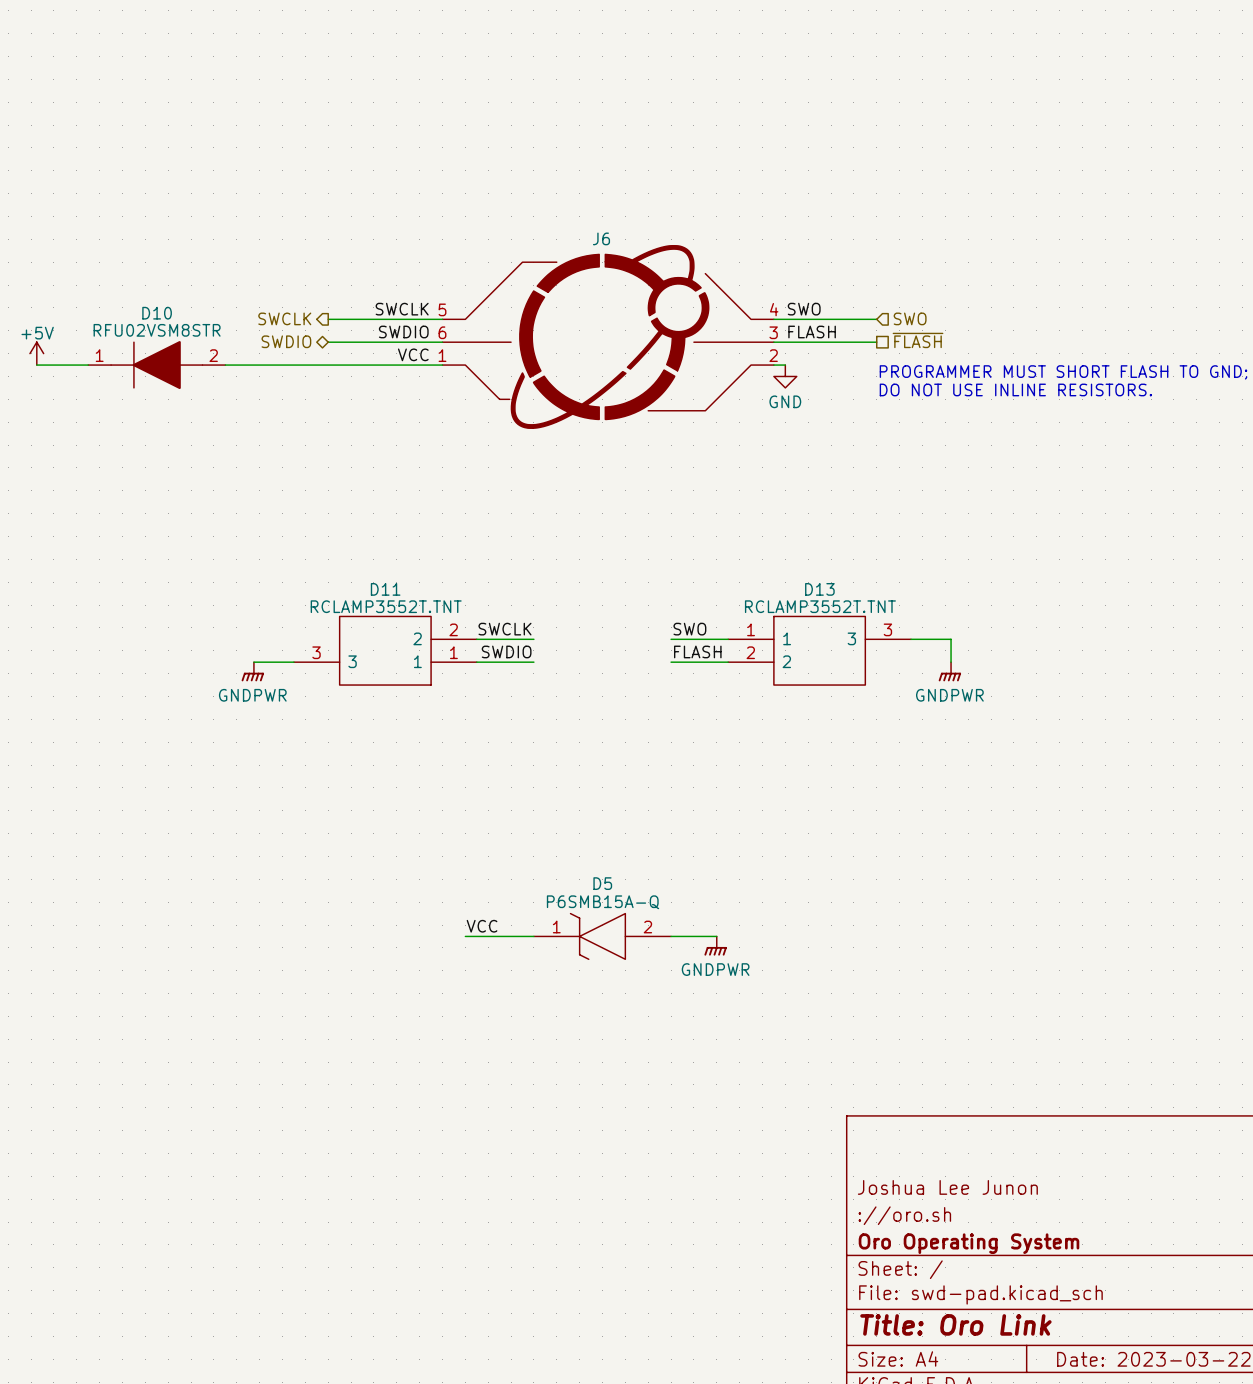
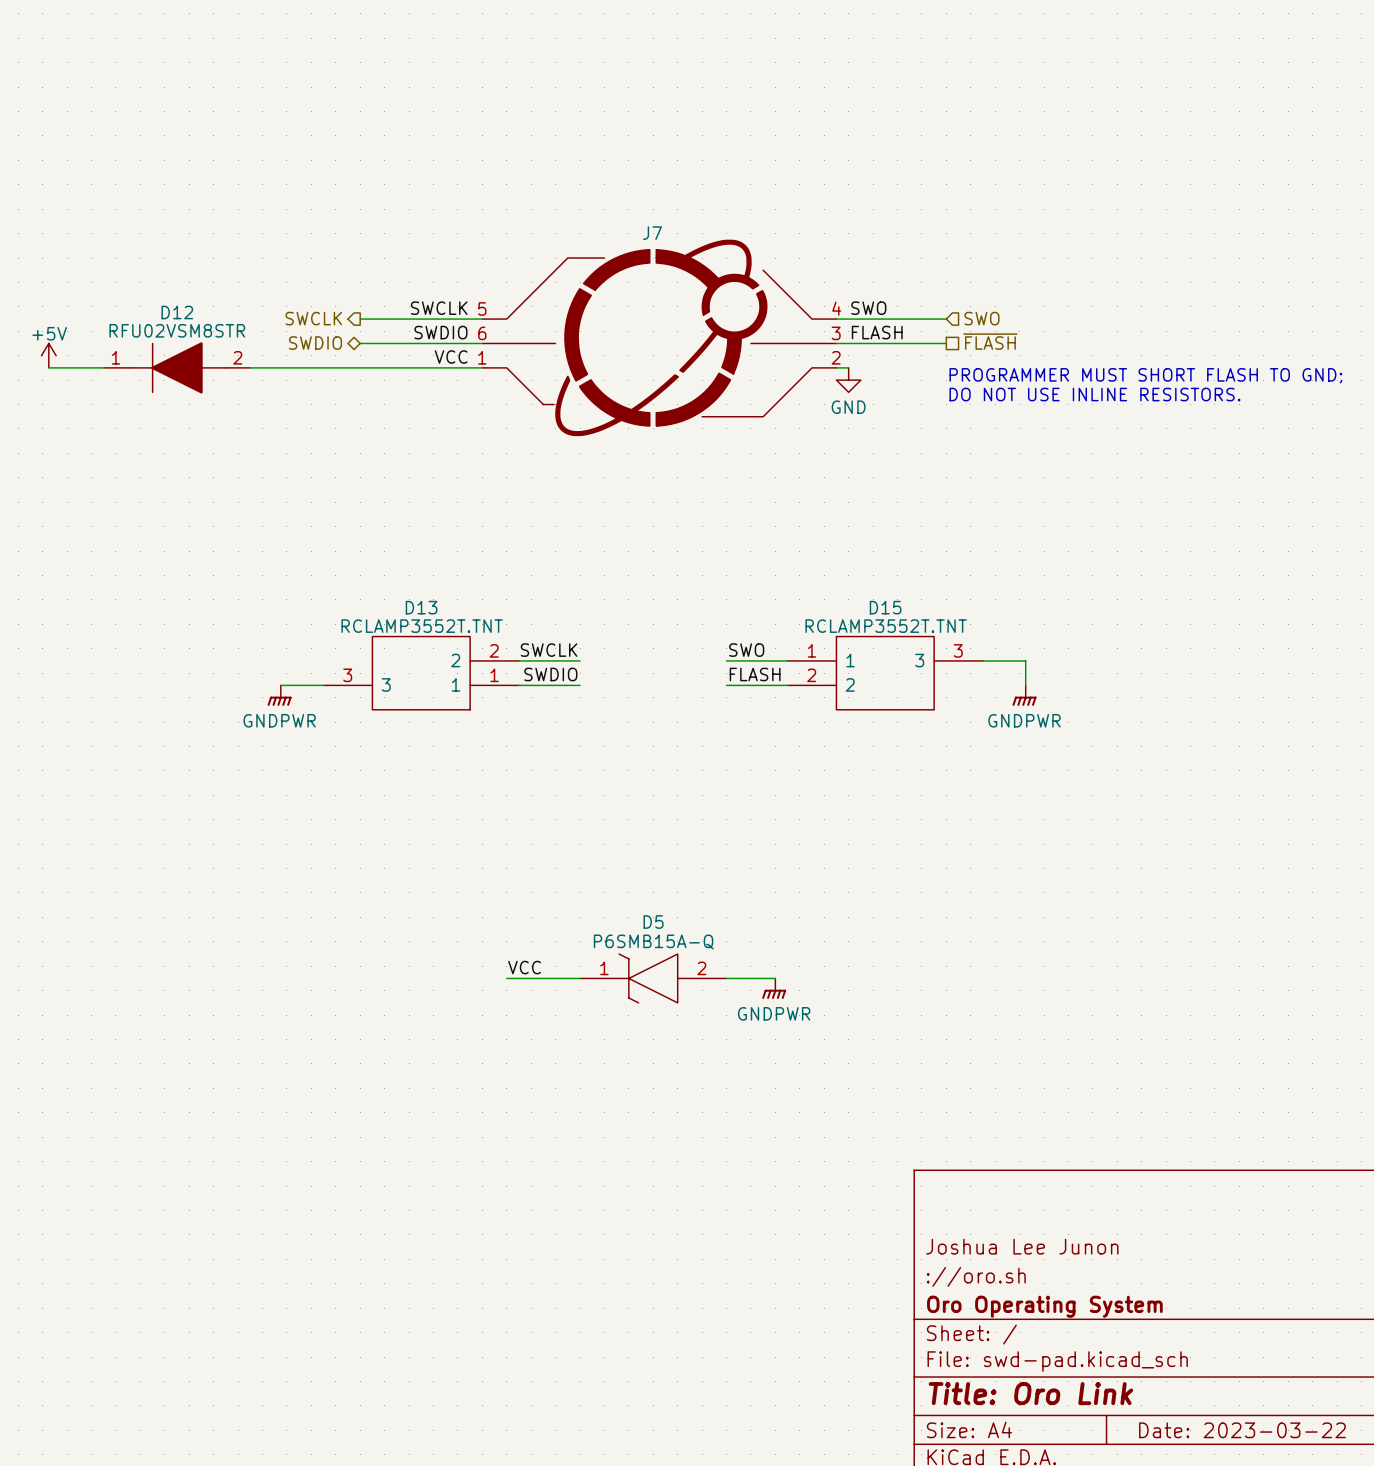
J6 name: J6 (601, 238) -> J7 (652, 233)
D10 name: D10 (157, 313) -> D12 (177, 312)
D11 name: D11 (385, 589) -> D13 (421, 607)
D13 name: D13 (819, 589) -> D15 (885, 607)

